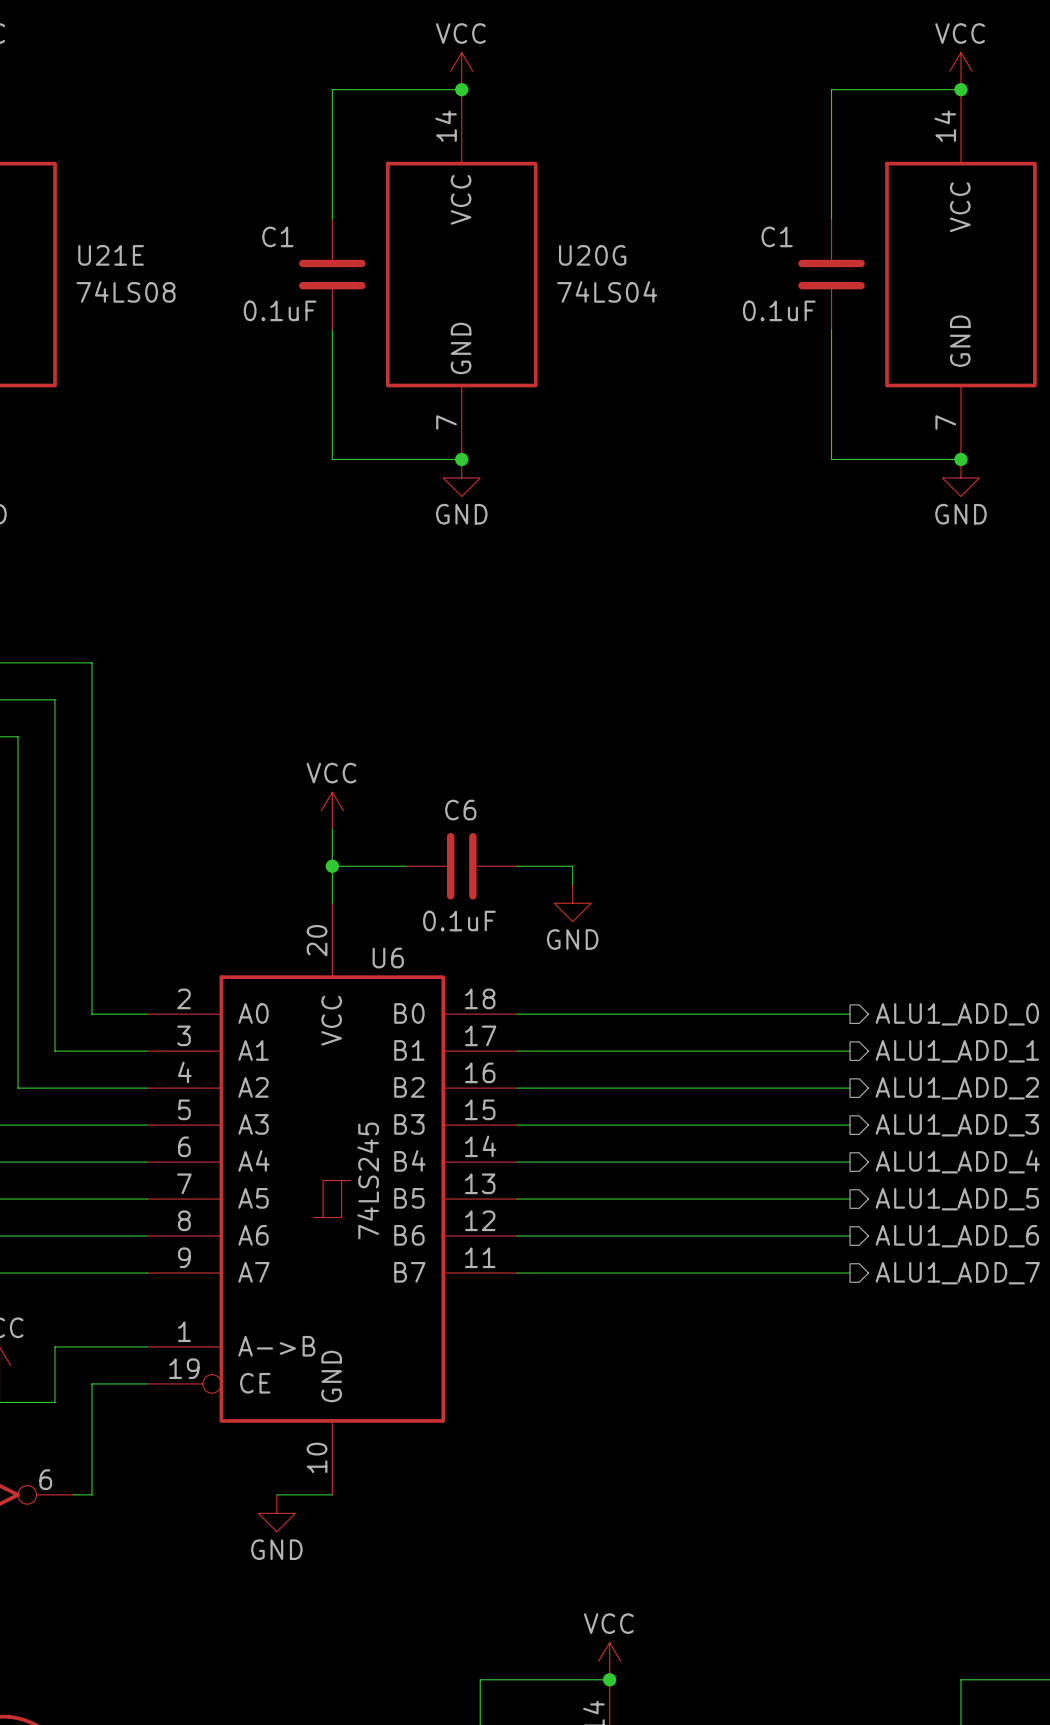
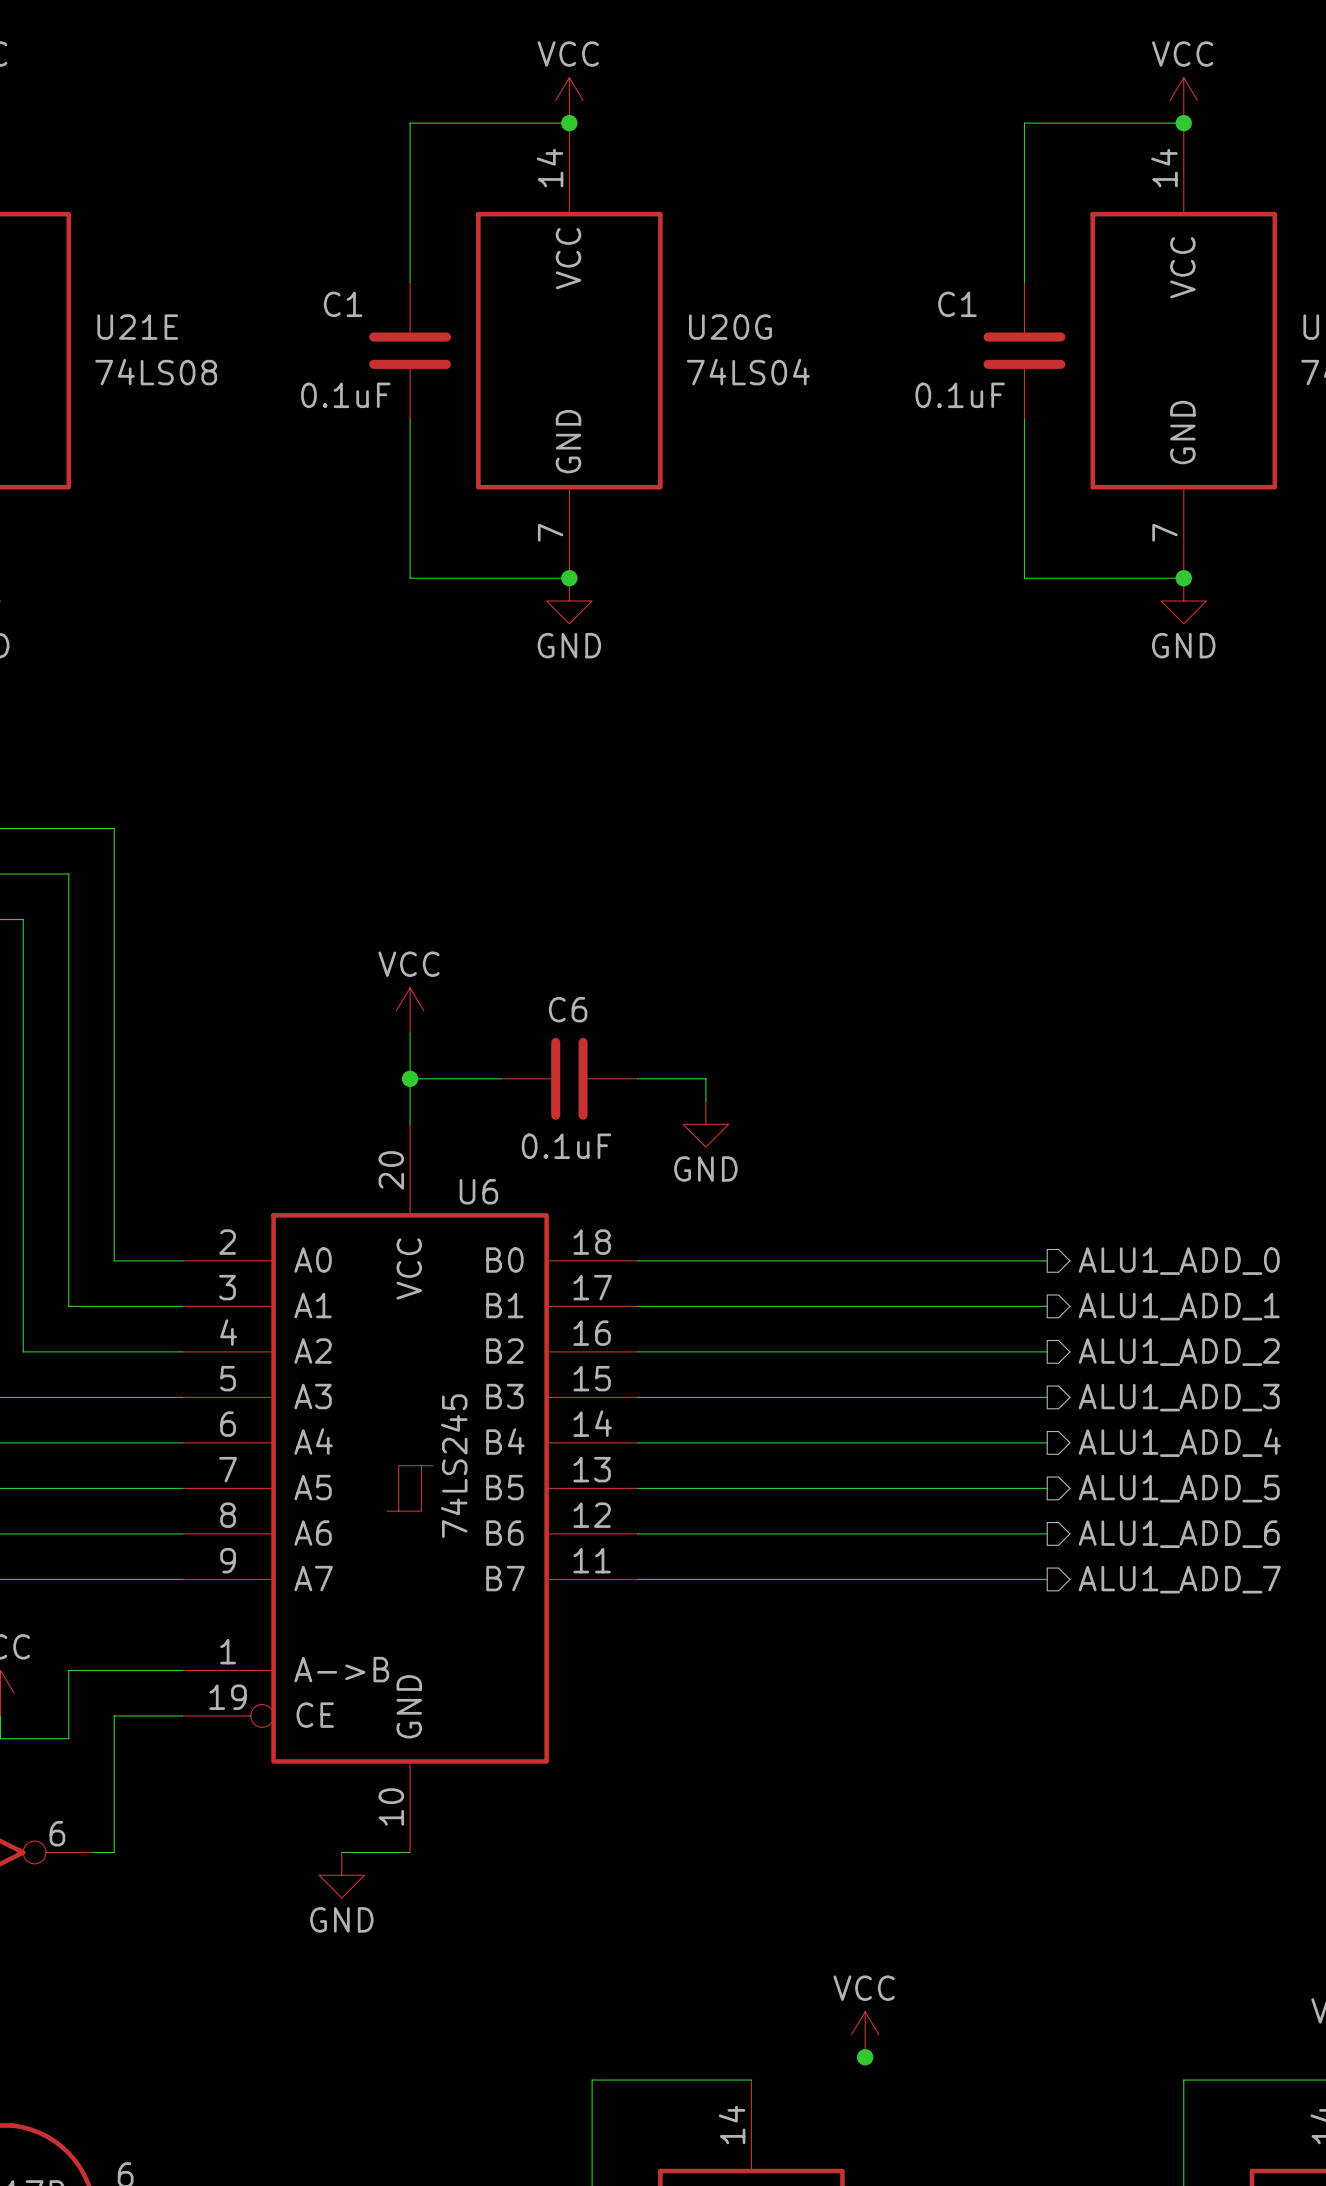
power symbol position: VCC (609, 1661) -> VCC (865, 2034)
junction: none -> (865, 2057)
junction: (609, 1679) -> none

